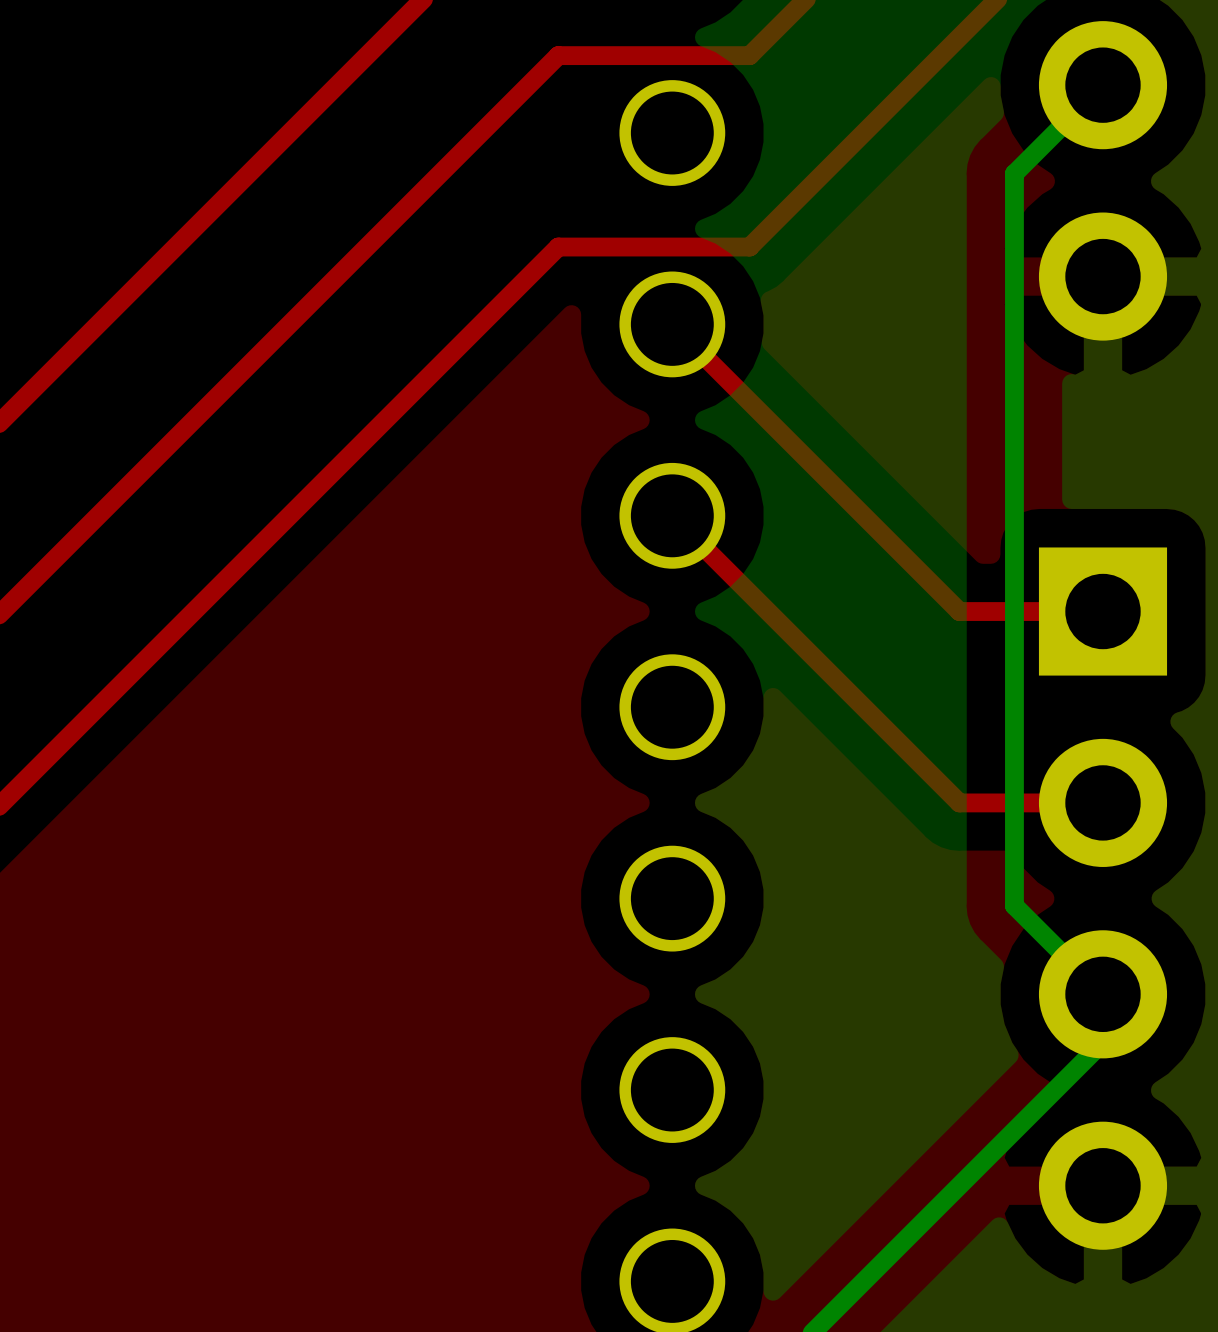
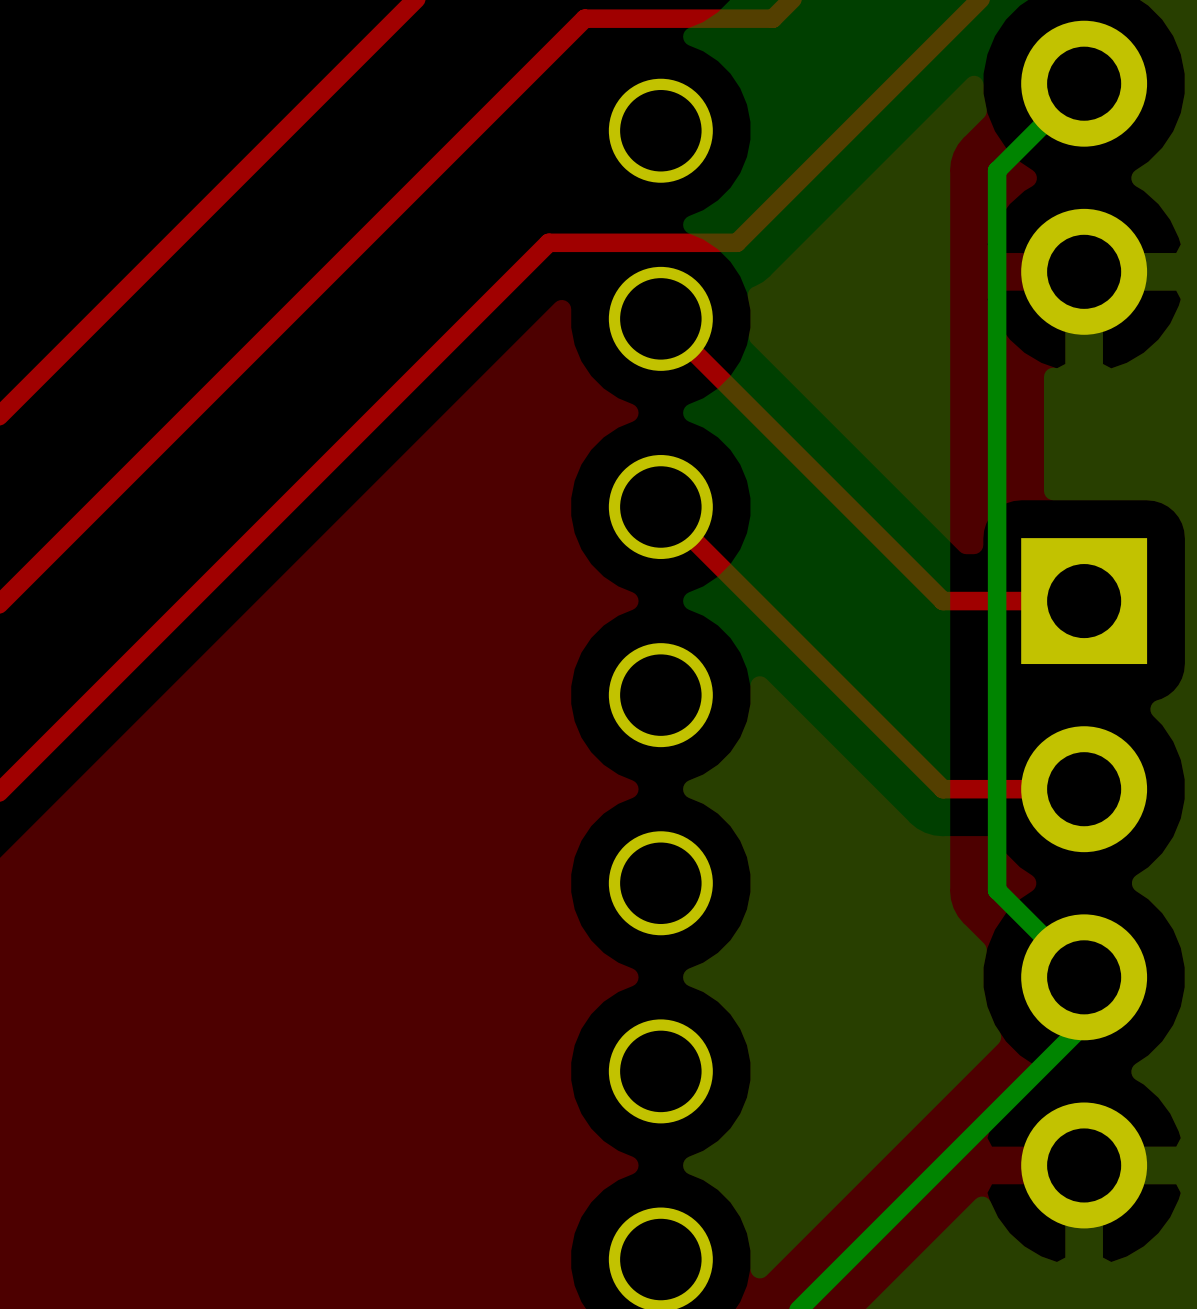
top track: (786, 19) (749, 55) (558, 55) -> (772, 18) (584, 18) (548, 54)

